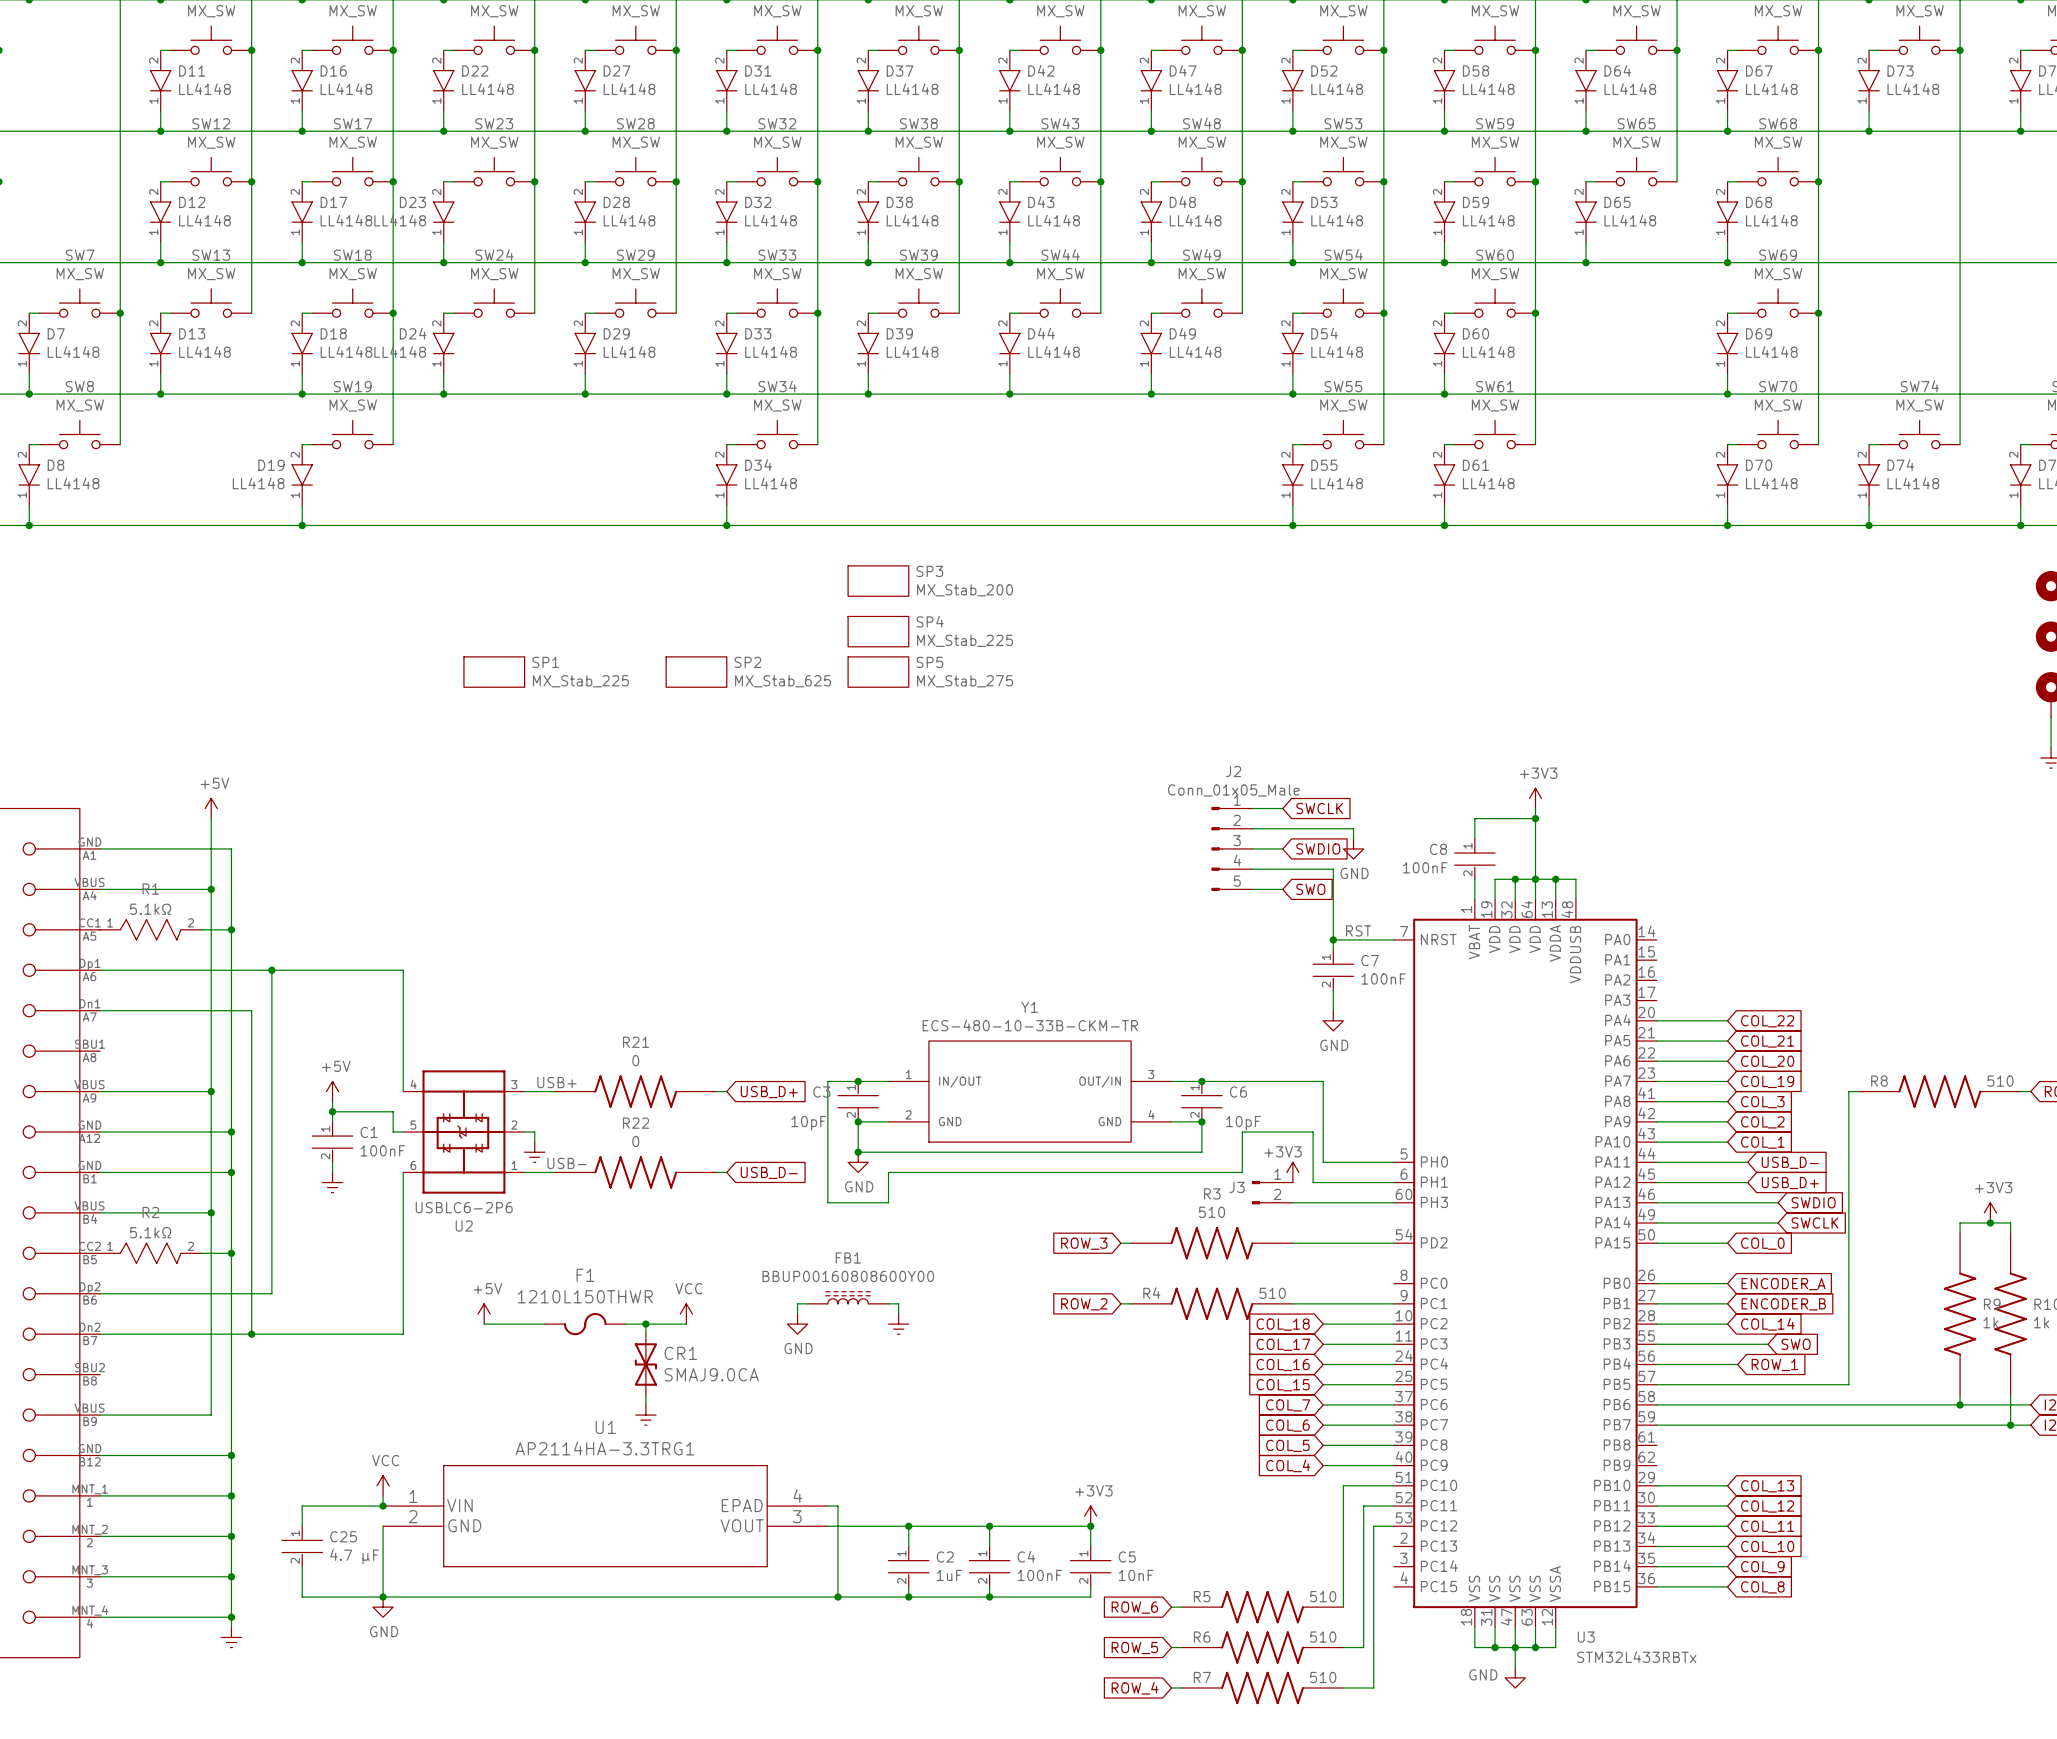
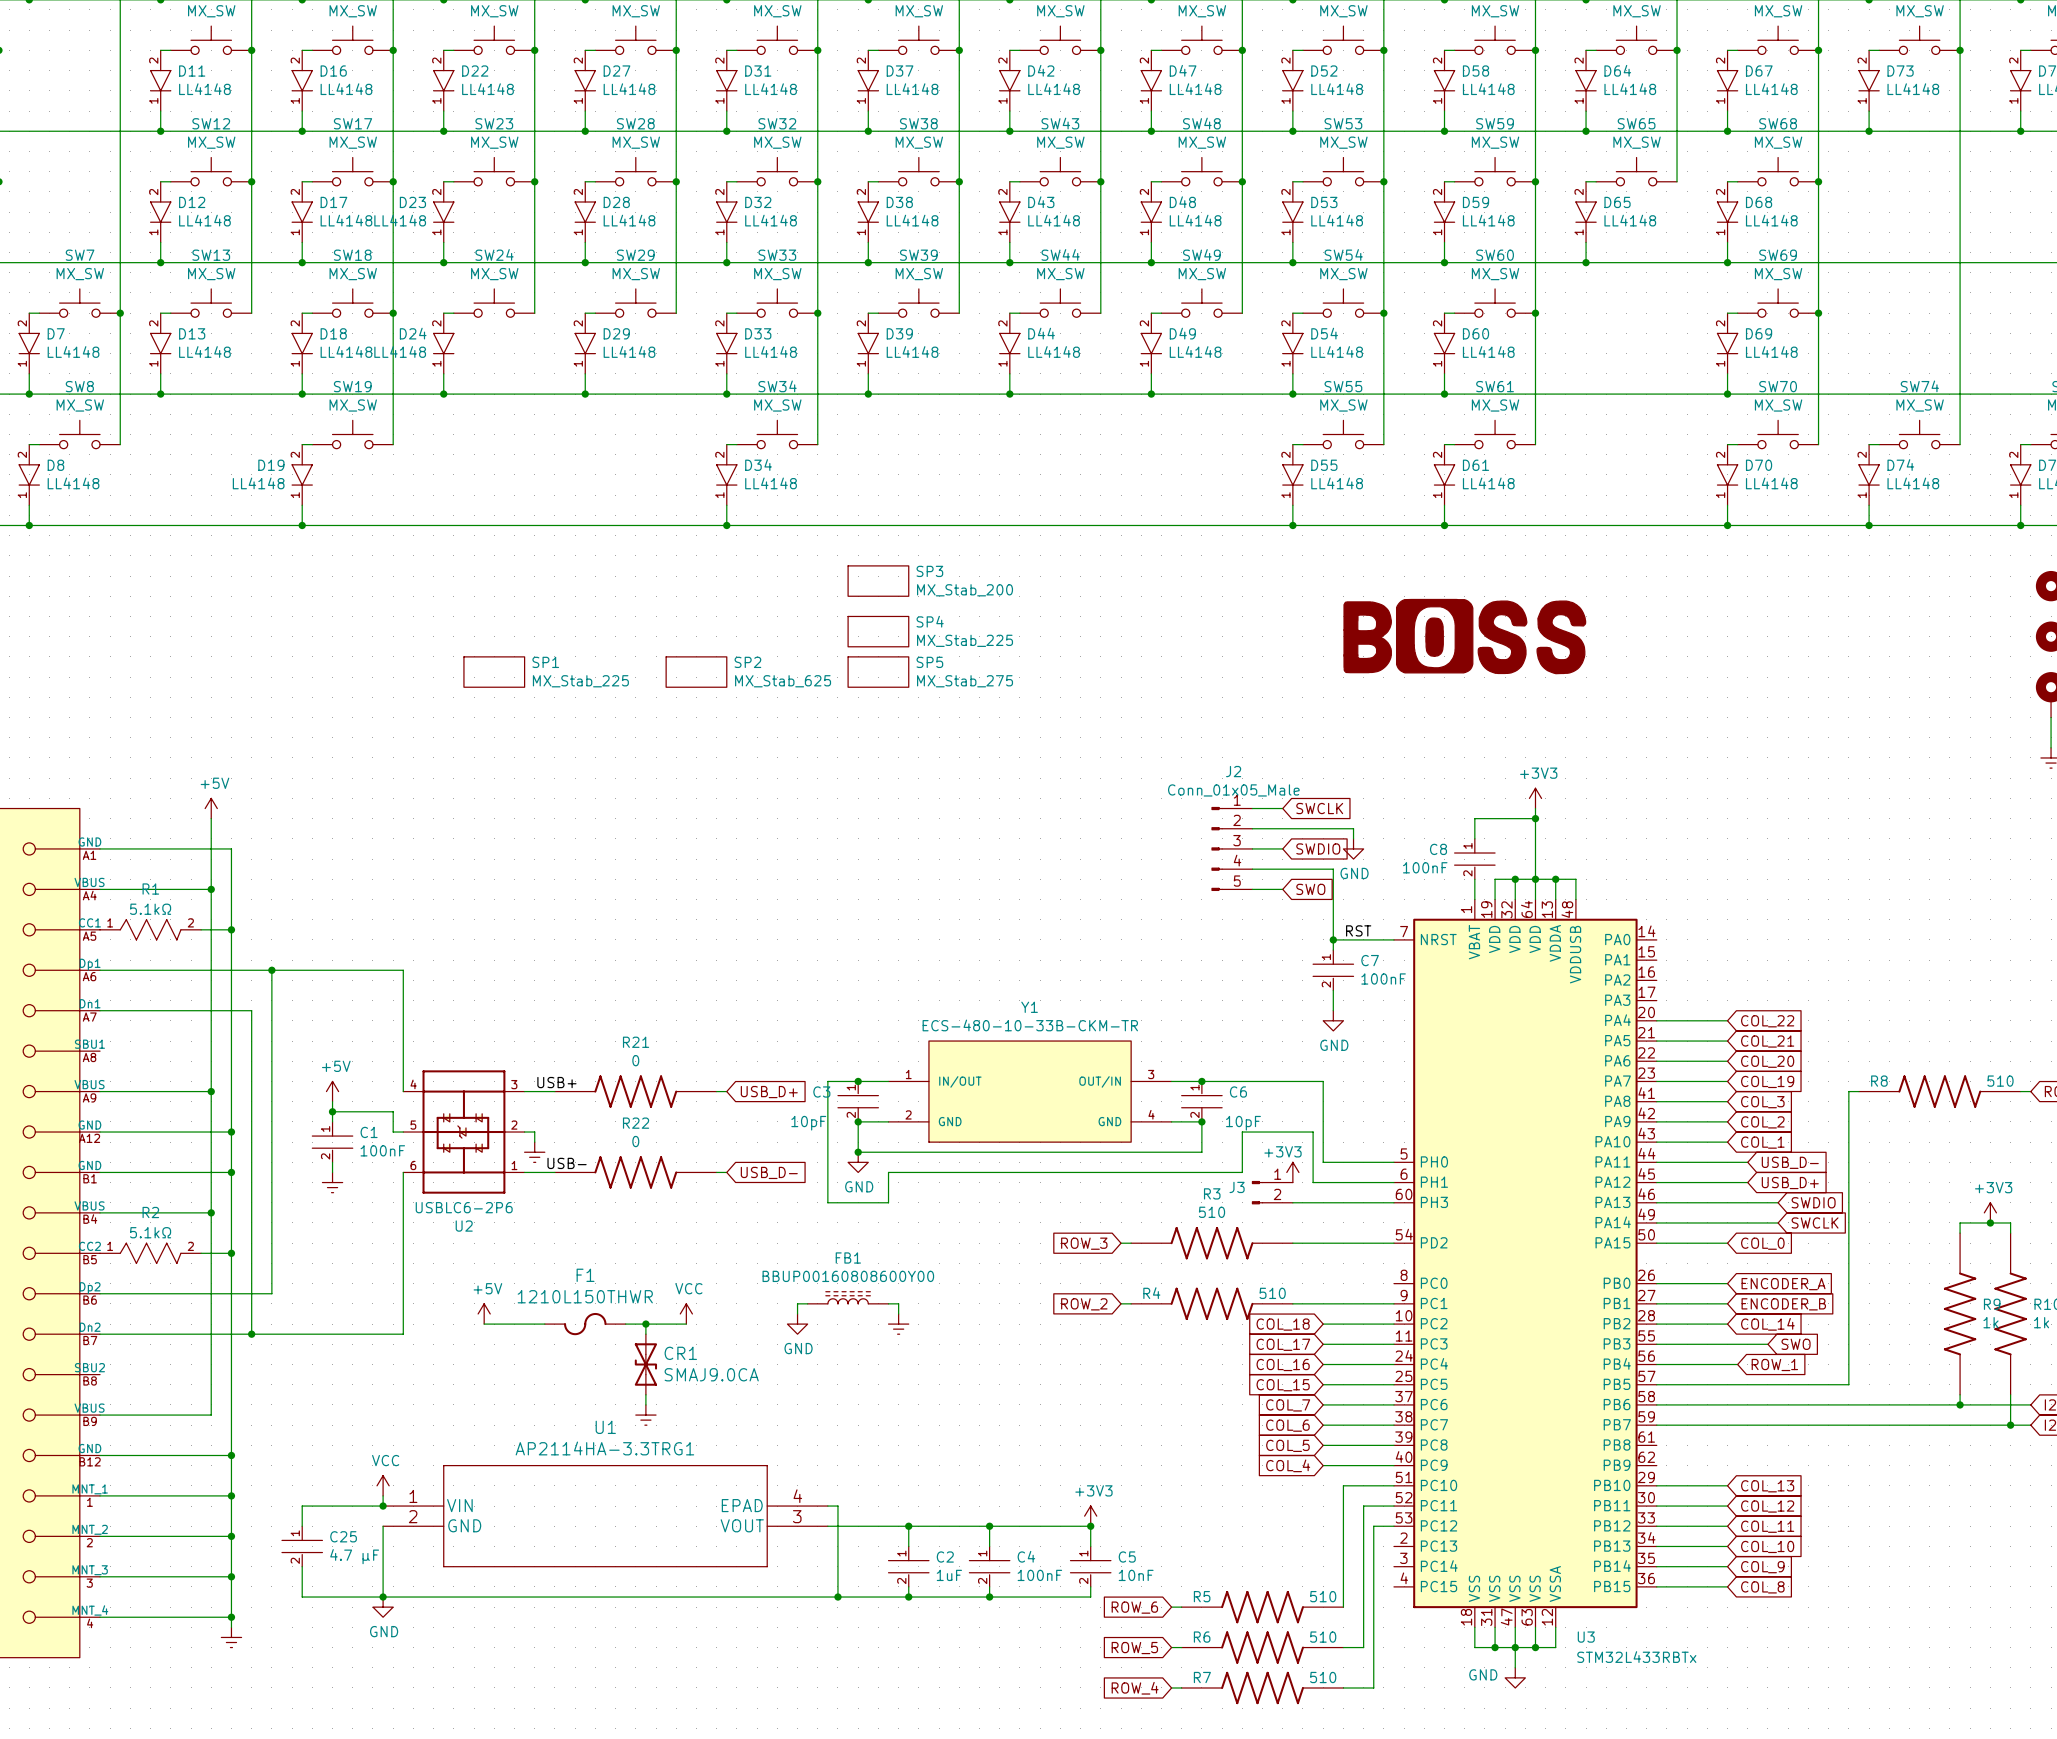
part: none -> (1464, 636)

